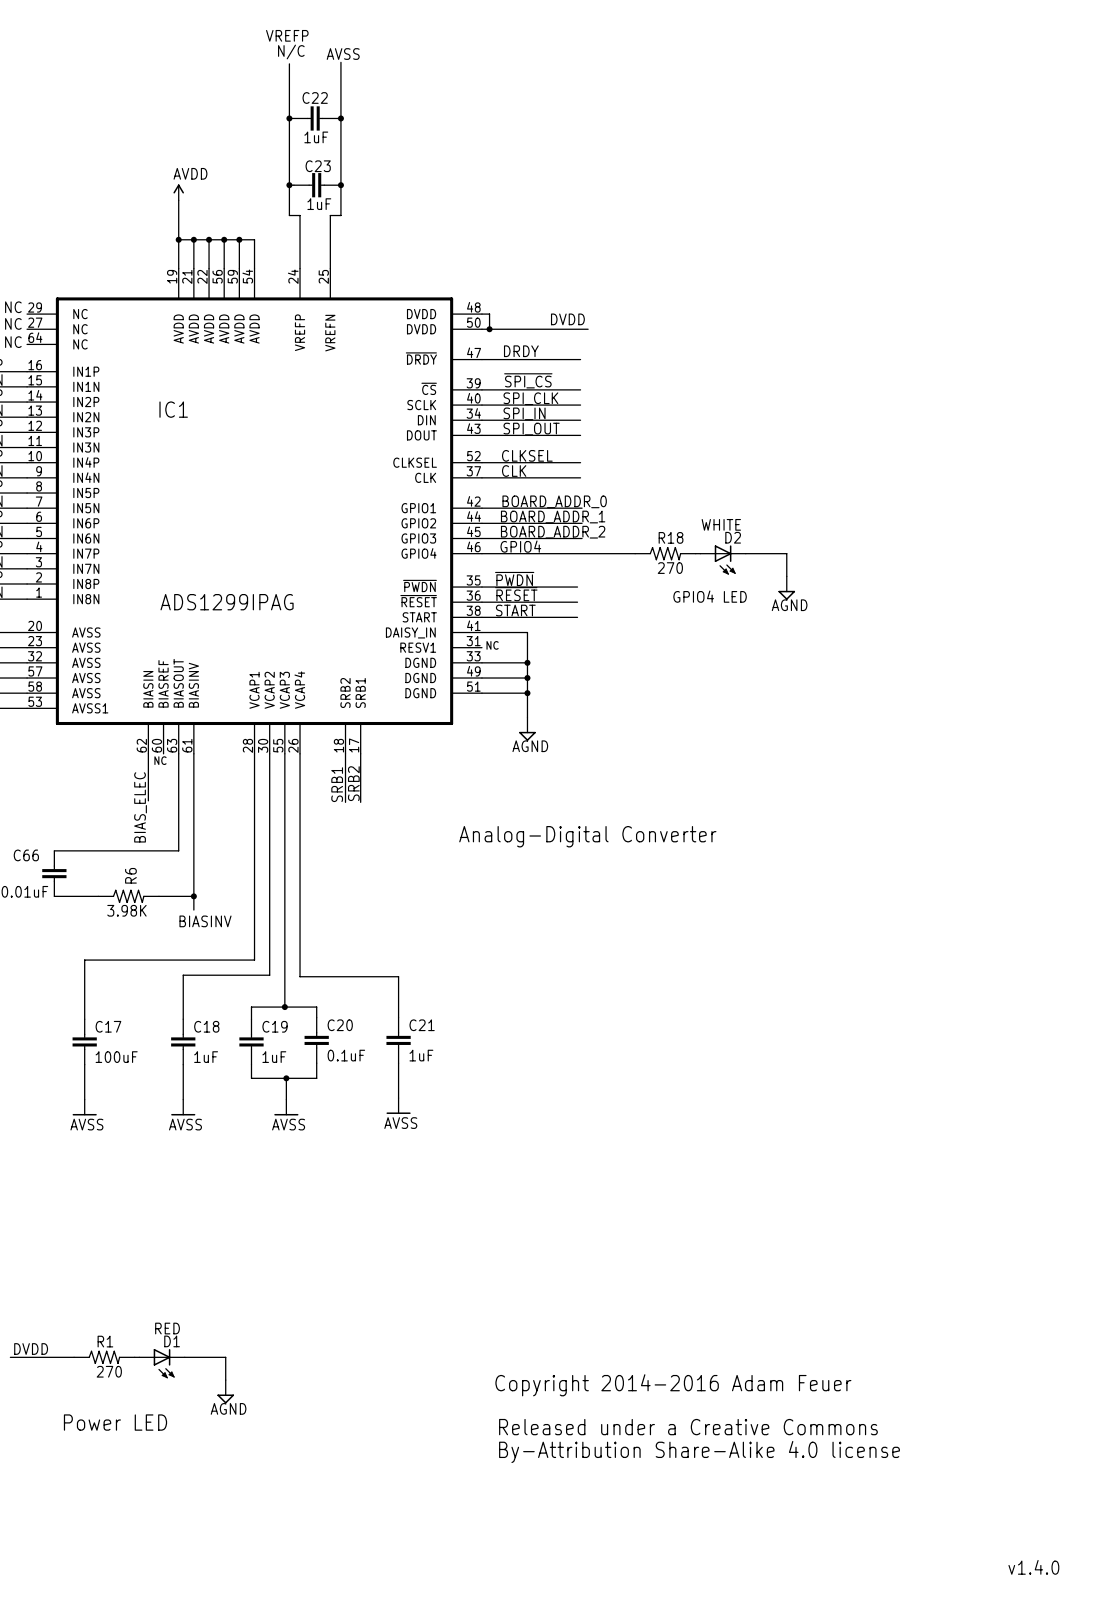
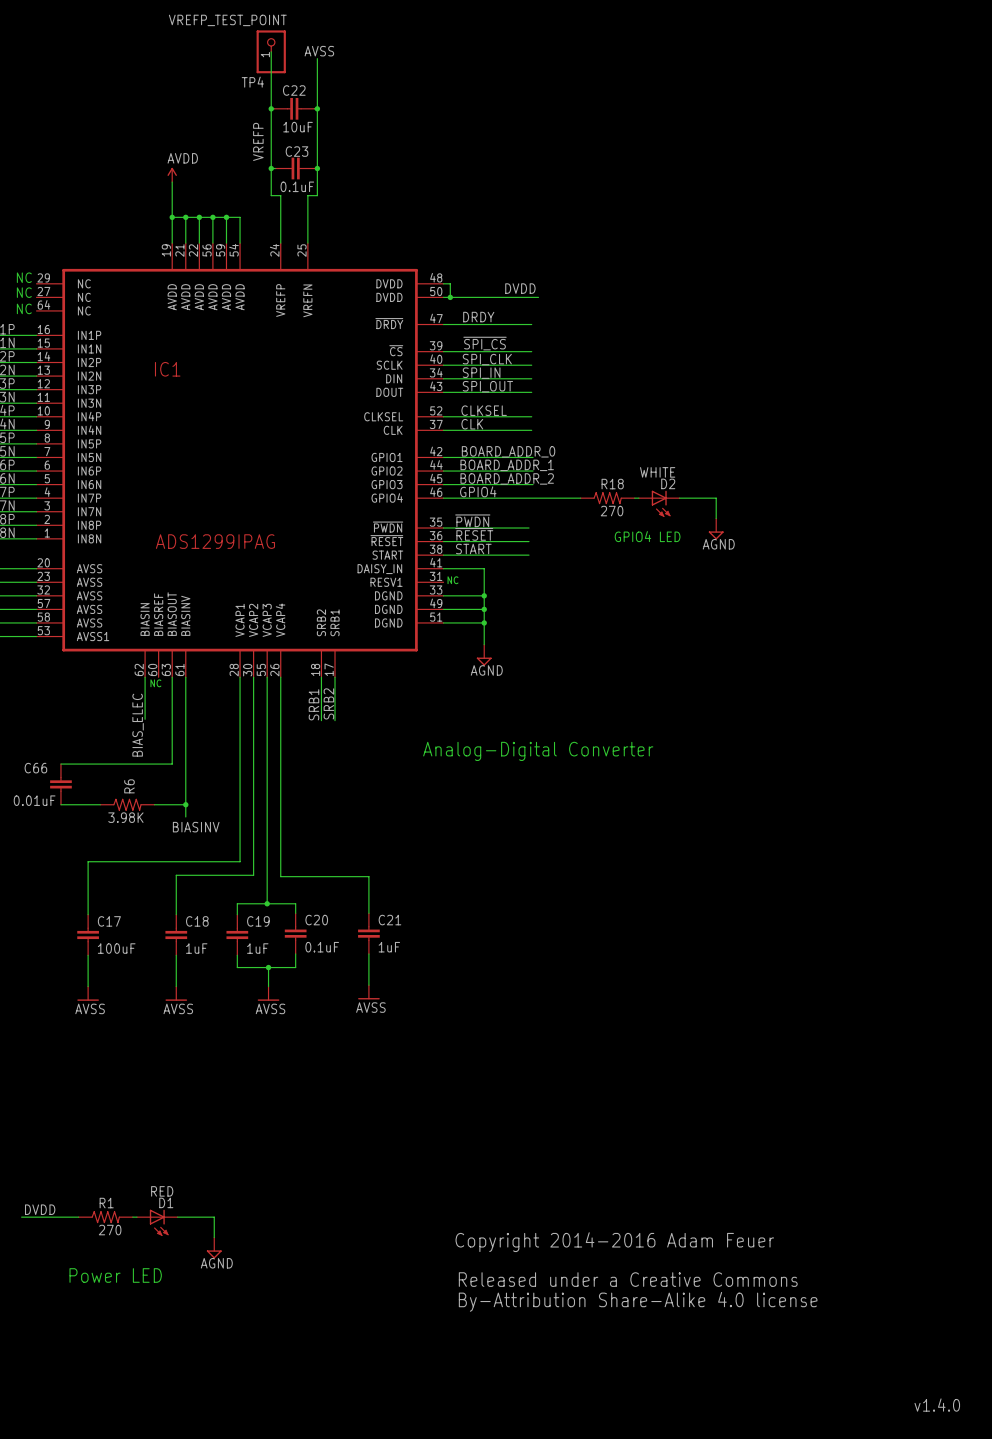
label rotation: 0° (287, 35) -> 90° counterclockwise (258, 141)
label position: VREFP (287, 35) -> VREFP (258, 141)
text: N/C (291, 52) -> none
wire: none -> (271, 51) (271, 59)
TP4: none -> VREFP_TEST_POINT (271, 51)
C22 value: 1uF (316, 137) -> 10uF (298, 127)
C23 value: 1uF (319, 204) -> 0.1uF (297, 186)

